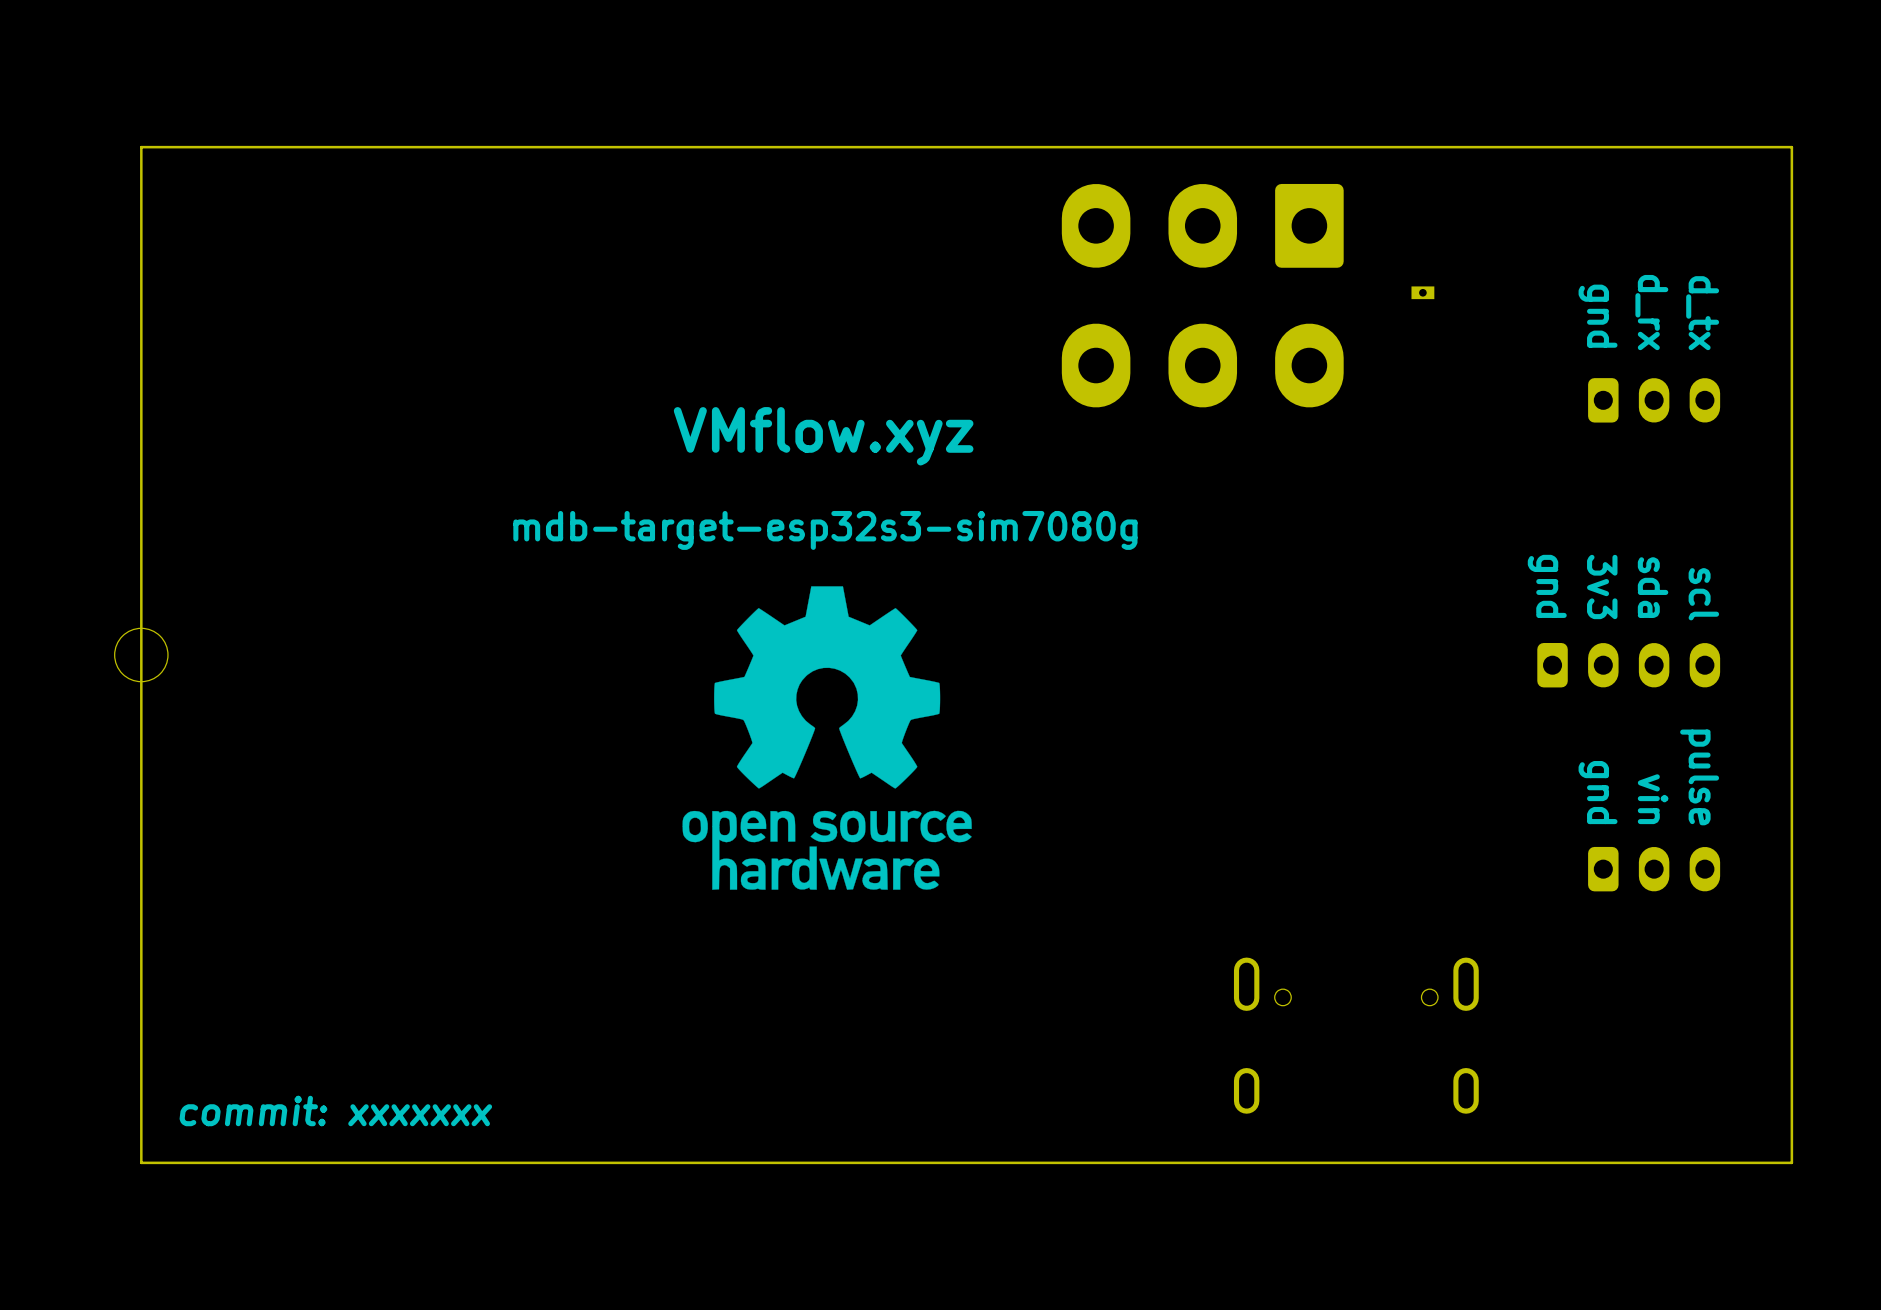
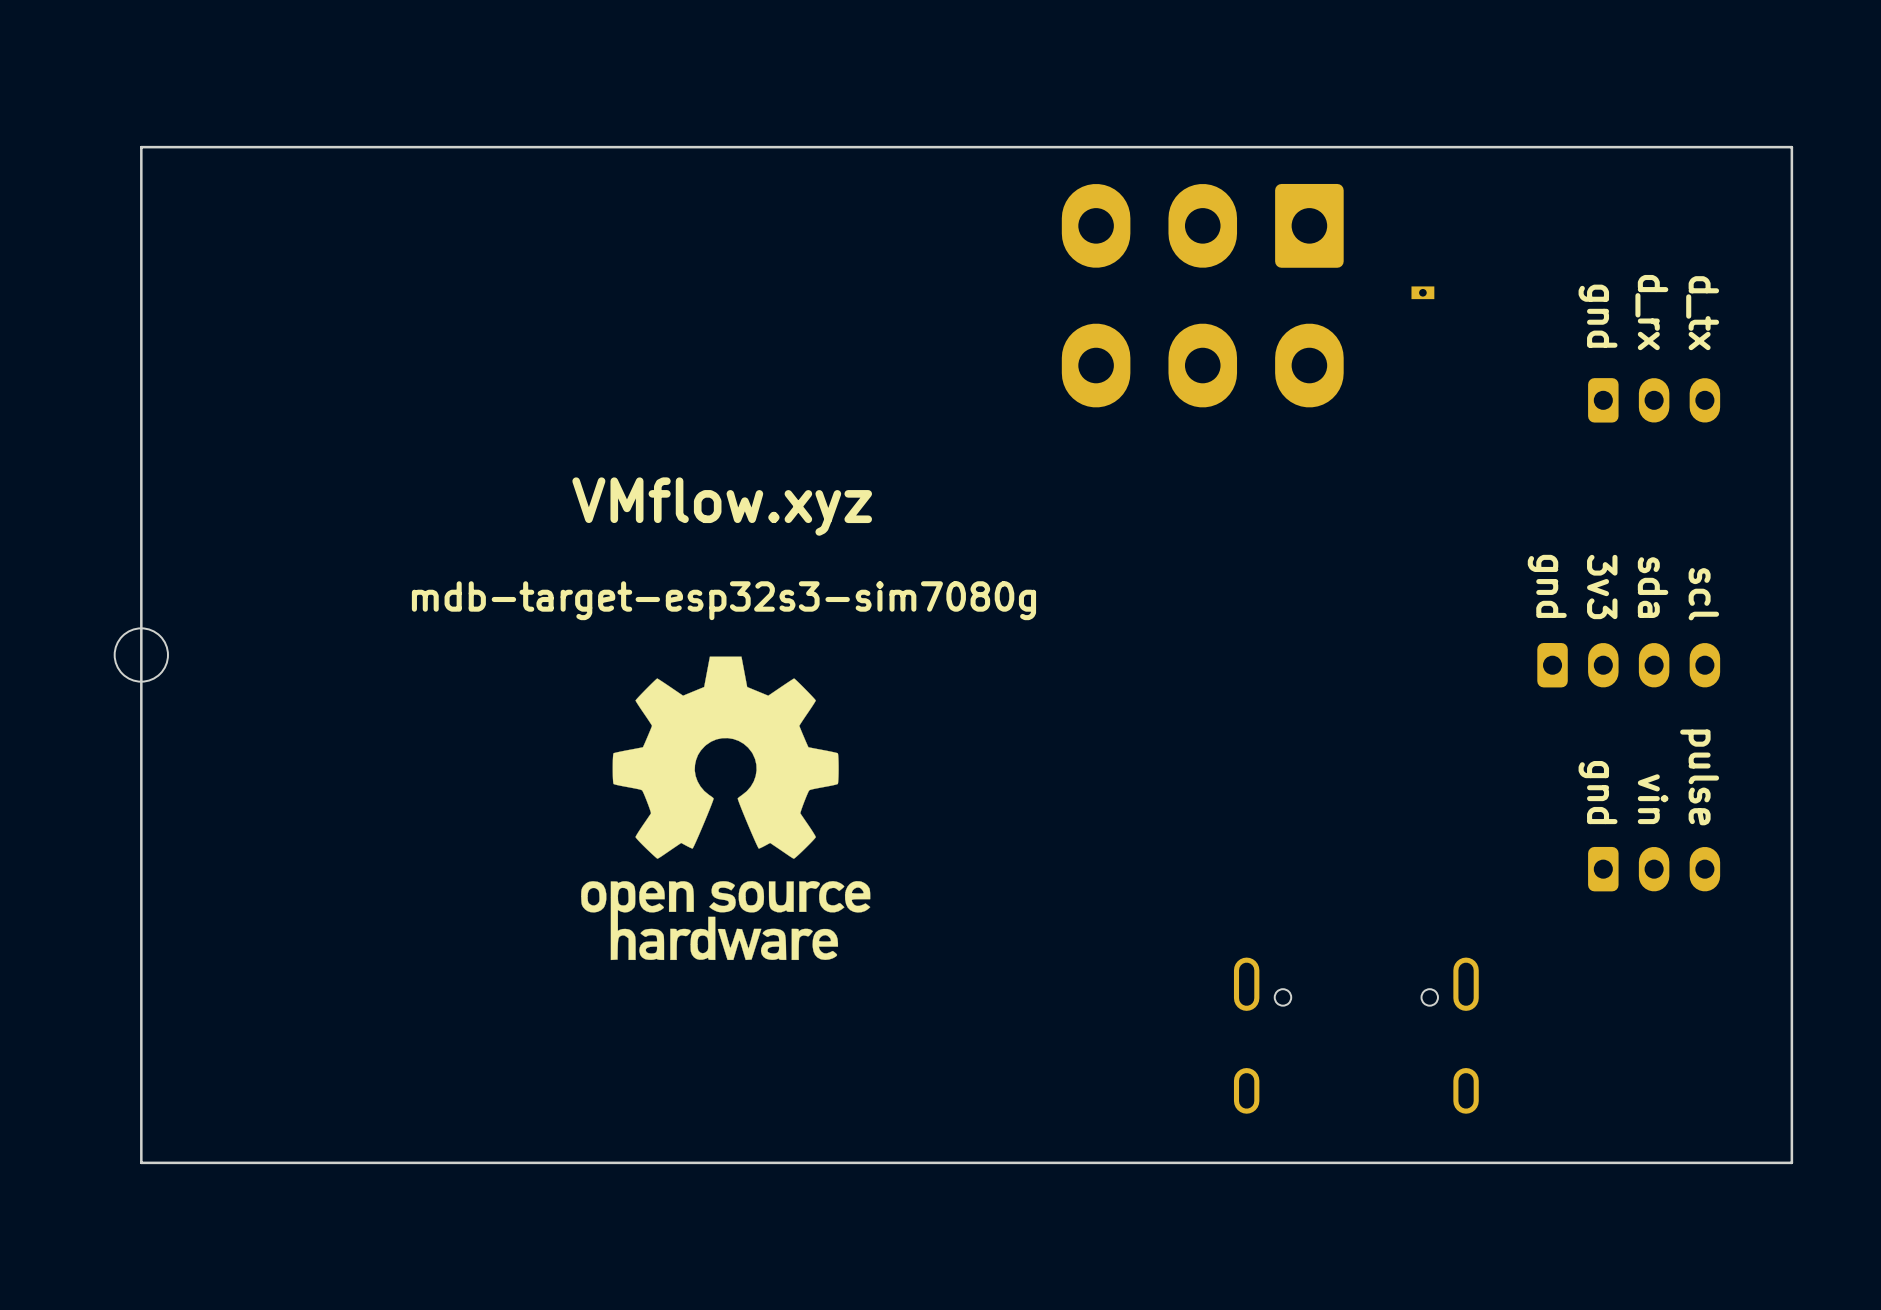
text position: VMflow.xyz (823, 436) -> VMflow.xyz (722, 506)
text position: mdb-target-esp32s3-sim7080g (825, 530) -> mdb-target-esp32s3-sim7080g (723, 600)
drawing position: (827, 738) -> (725, 808)
text: commit: xxxxxxx (335, 1111) -> none

